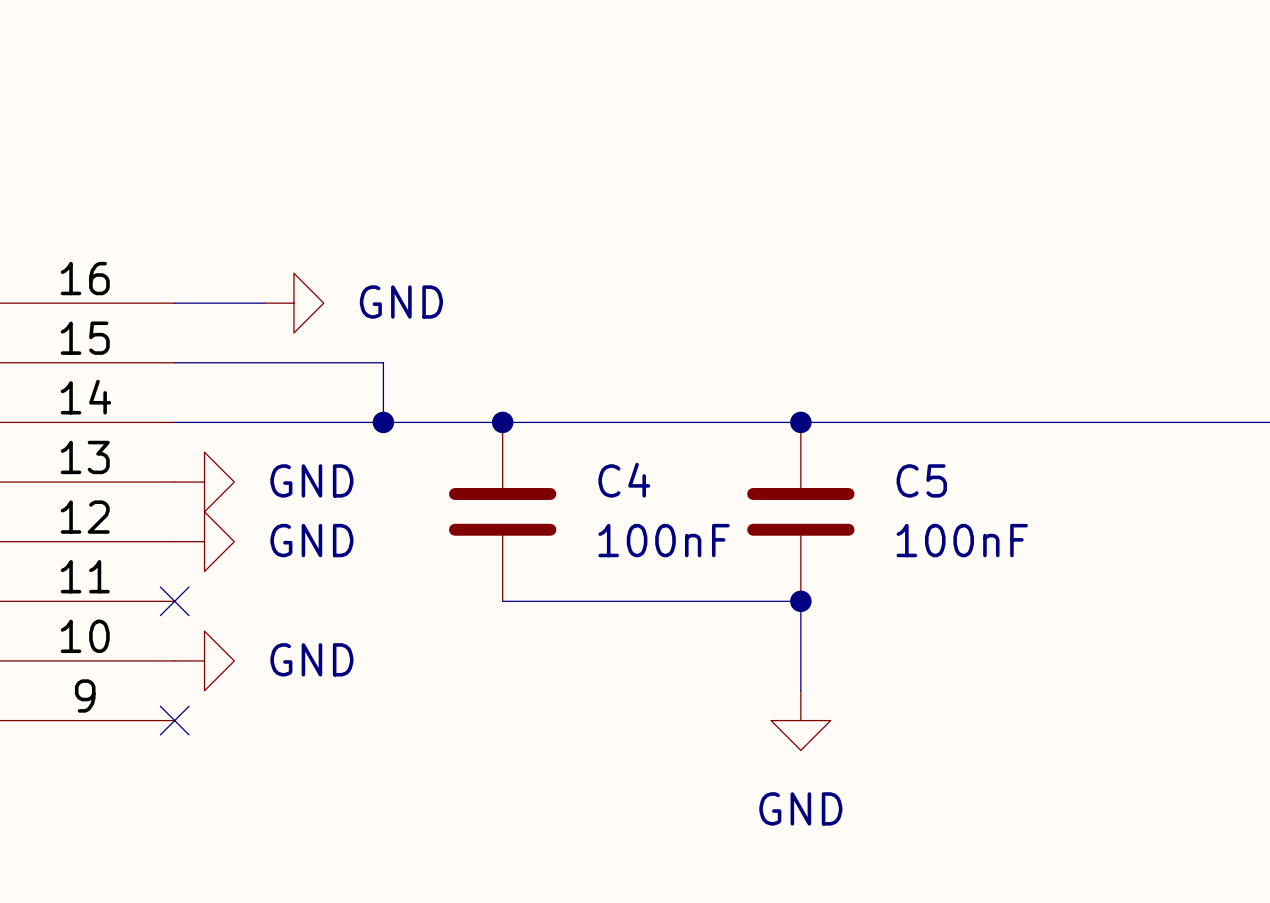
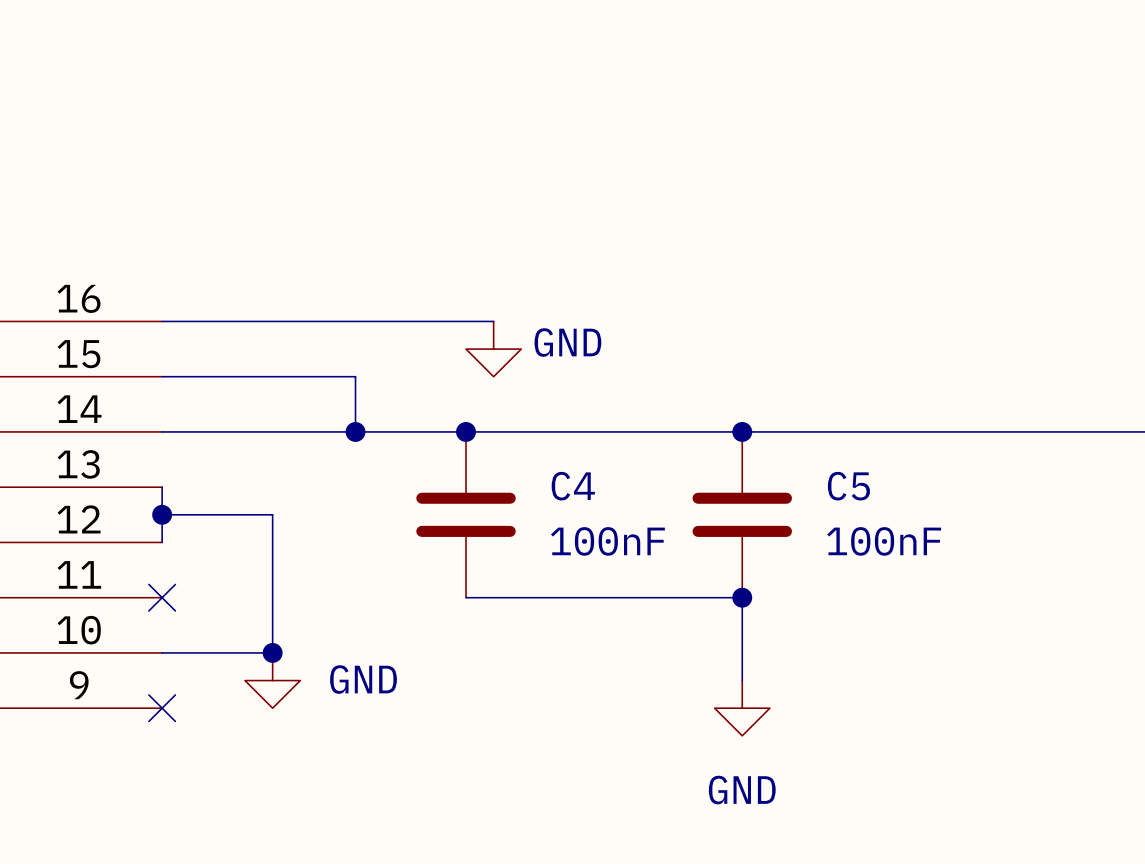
wire: none -> (245, 321) (493, 321)
power symbol: GND (293, 303) -> none
power symbol: none -> GND (493, 349)
wire: none -> (162, 487) (162, 542)
power symbol: GND (204, 482) -> none
wire: none -> (162, 514) (272, 514) (272, 652) (162, 652)
junction: none -> (162, 514)
power symbol: GND (204, 541) -> none
power symbol: GND (204, 660) -> none
junction: none -> (272, 652)
power symbol: none -> GND (272, 680)

